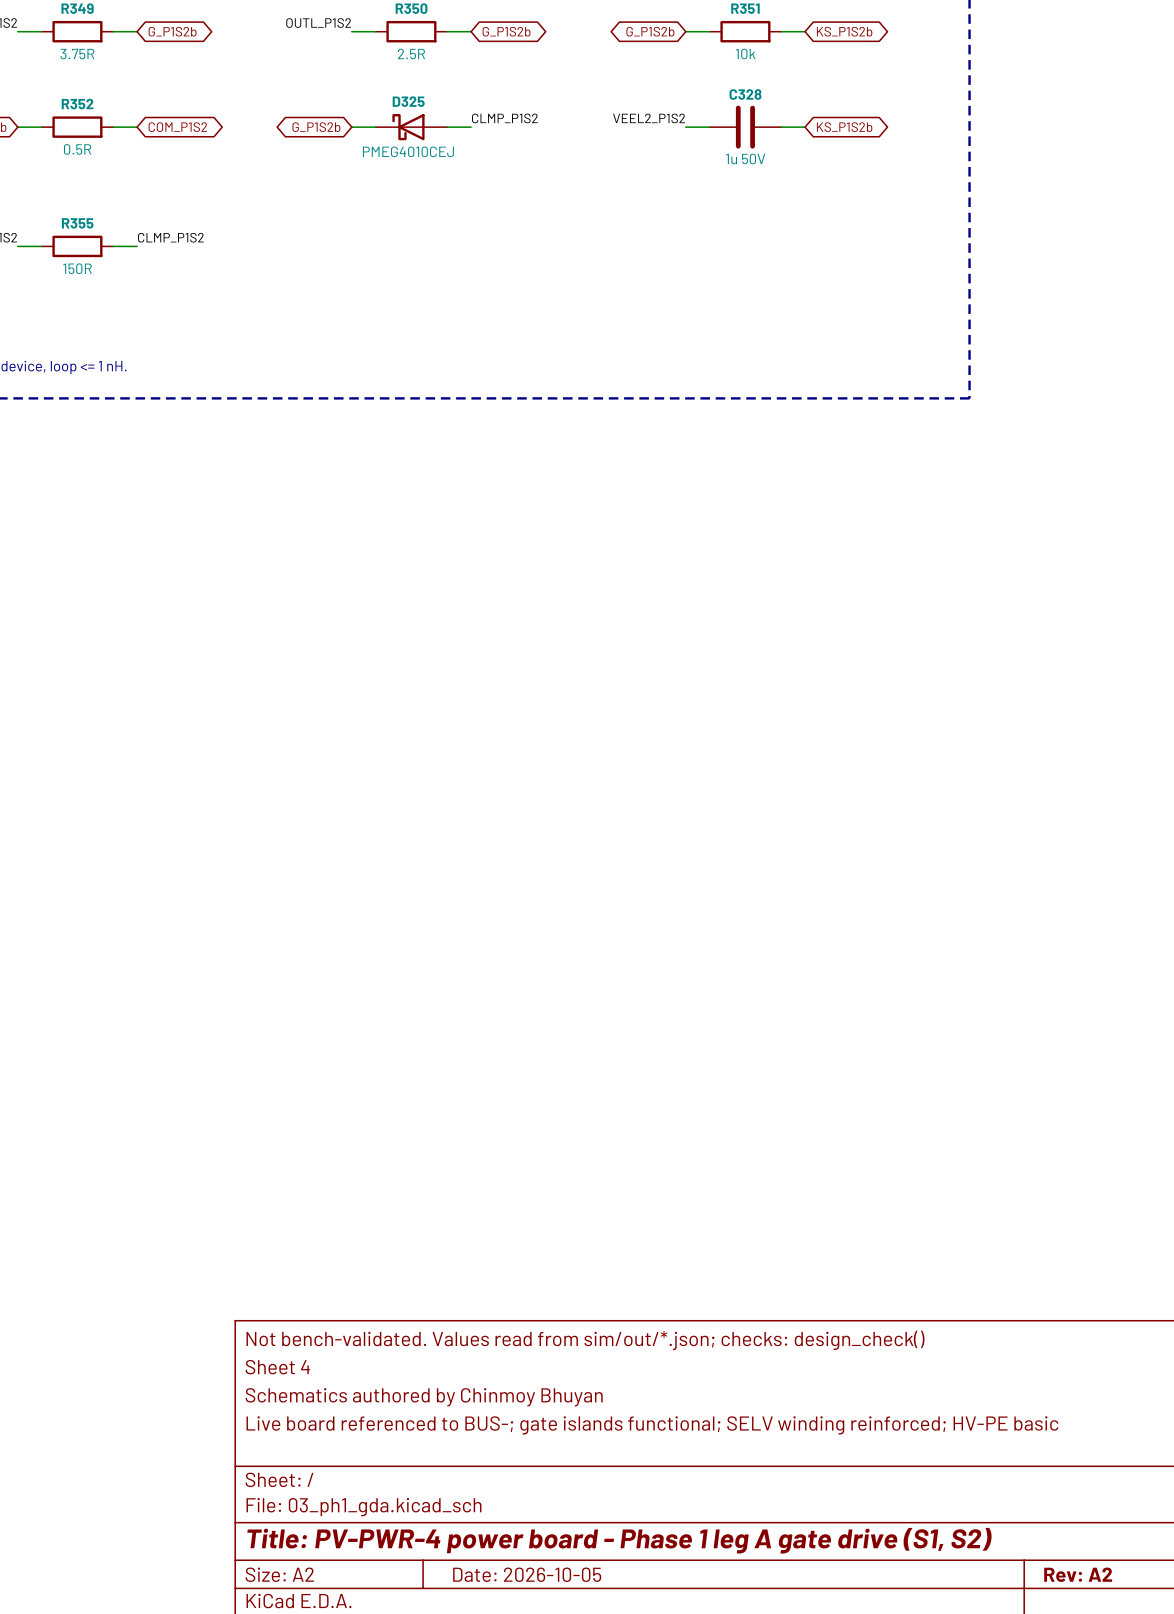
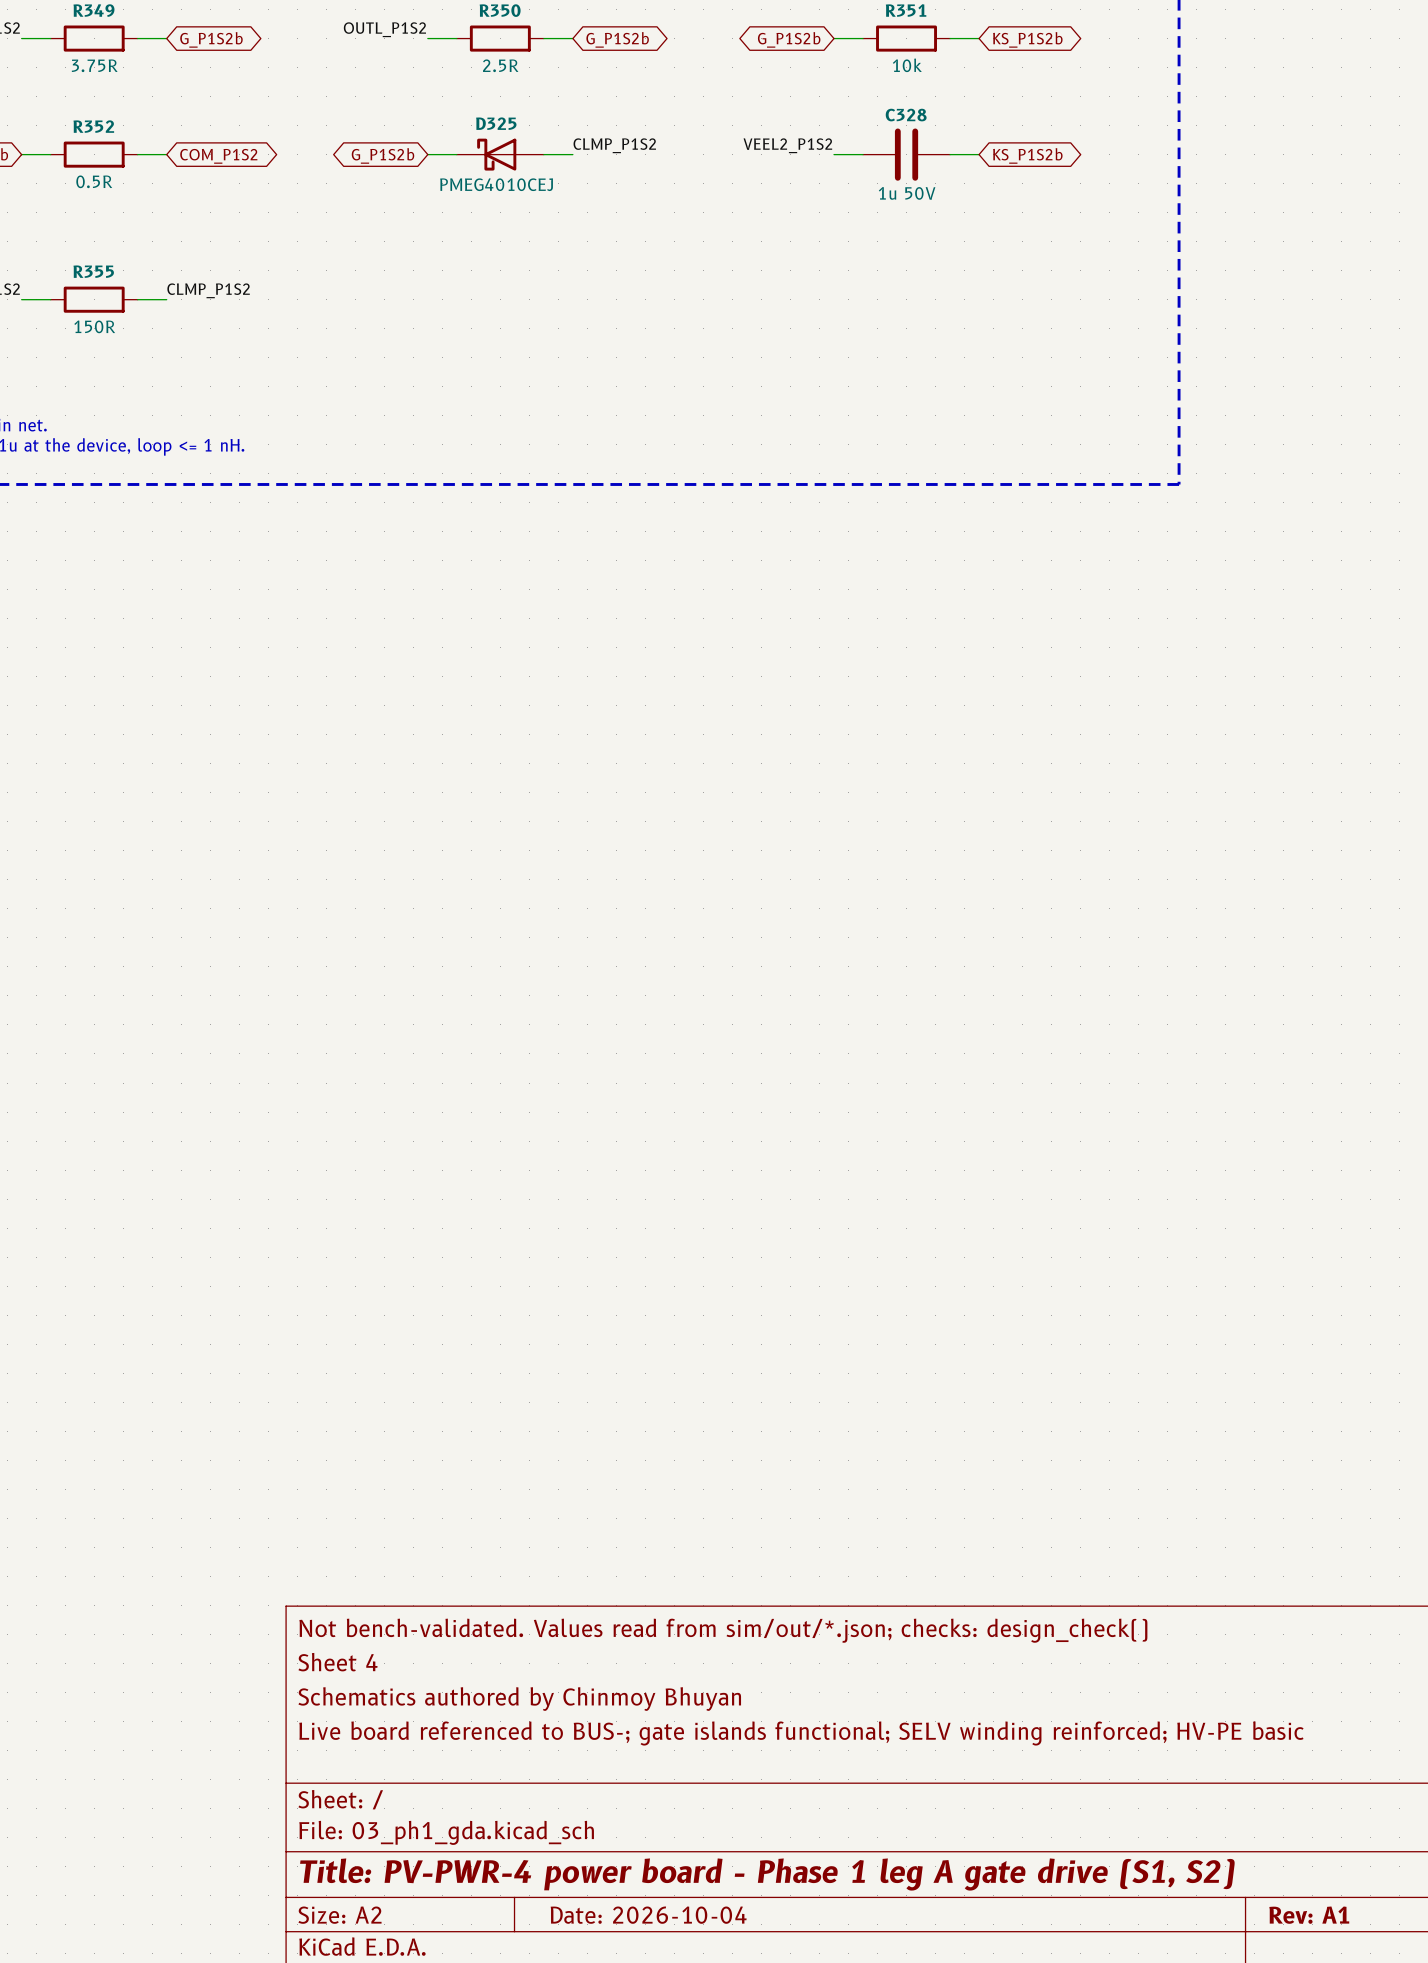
title block: Date: 2026-10-05 (527, 1574) -> Date: 2026-10-04 (648, 1915)
title block: Rev: A2 (1078, 1574) -> Rev: A1 (1309, 1915)

